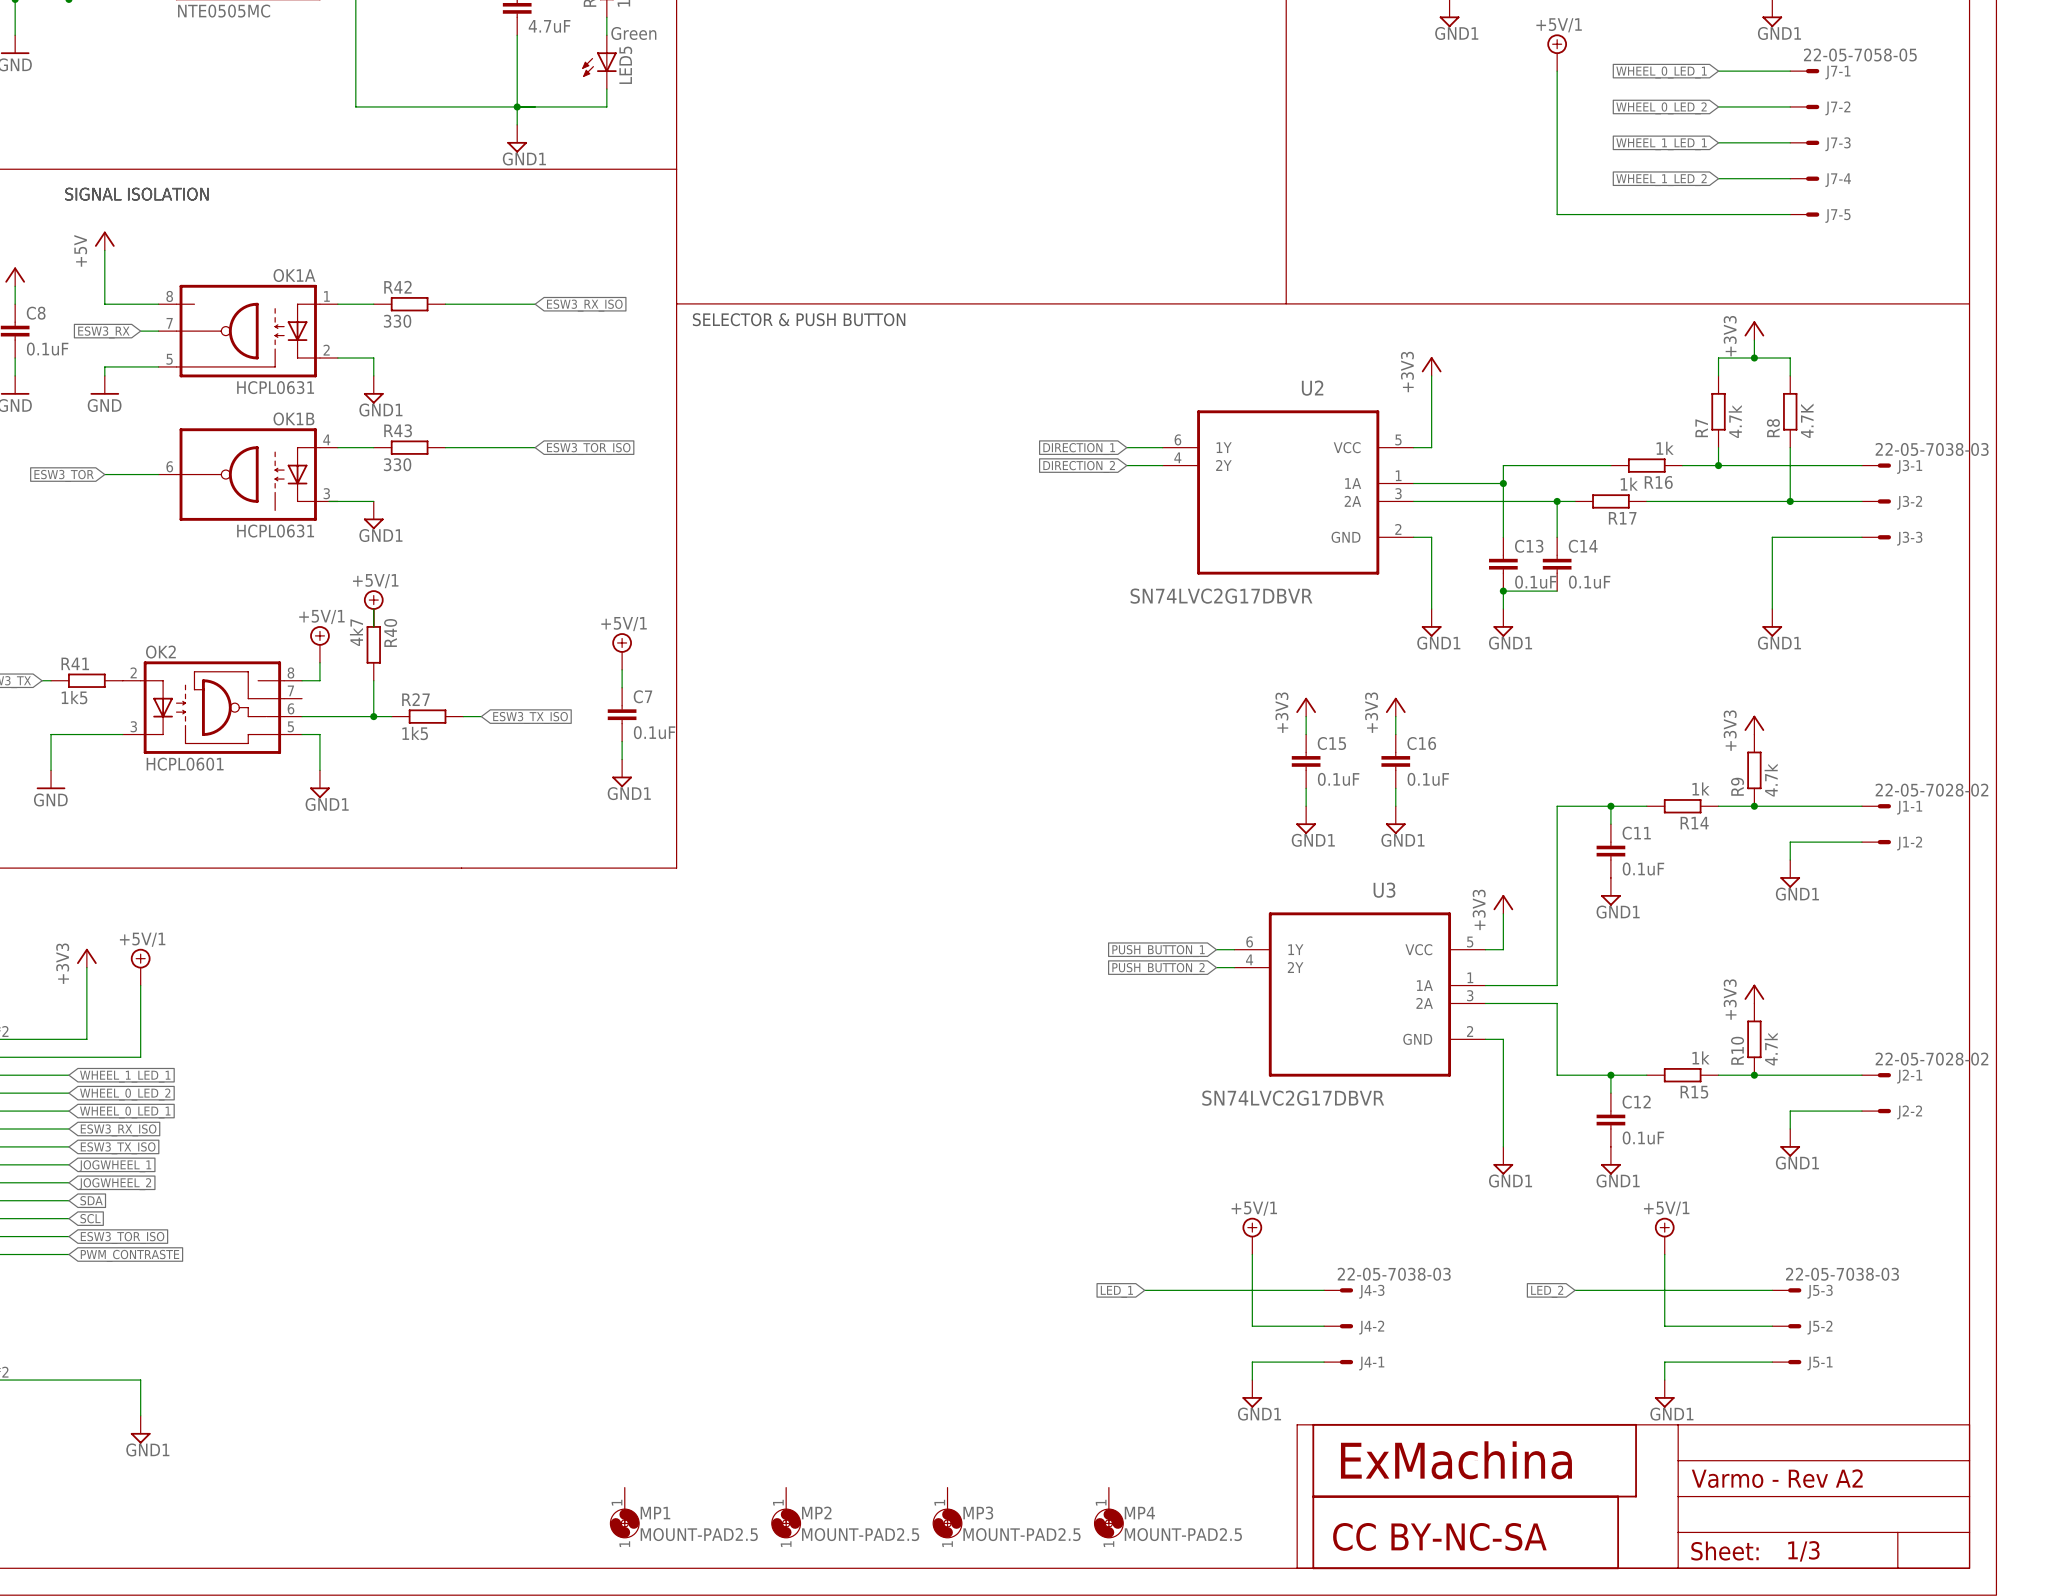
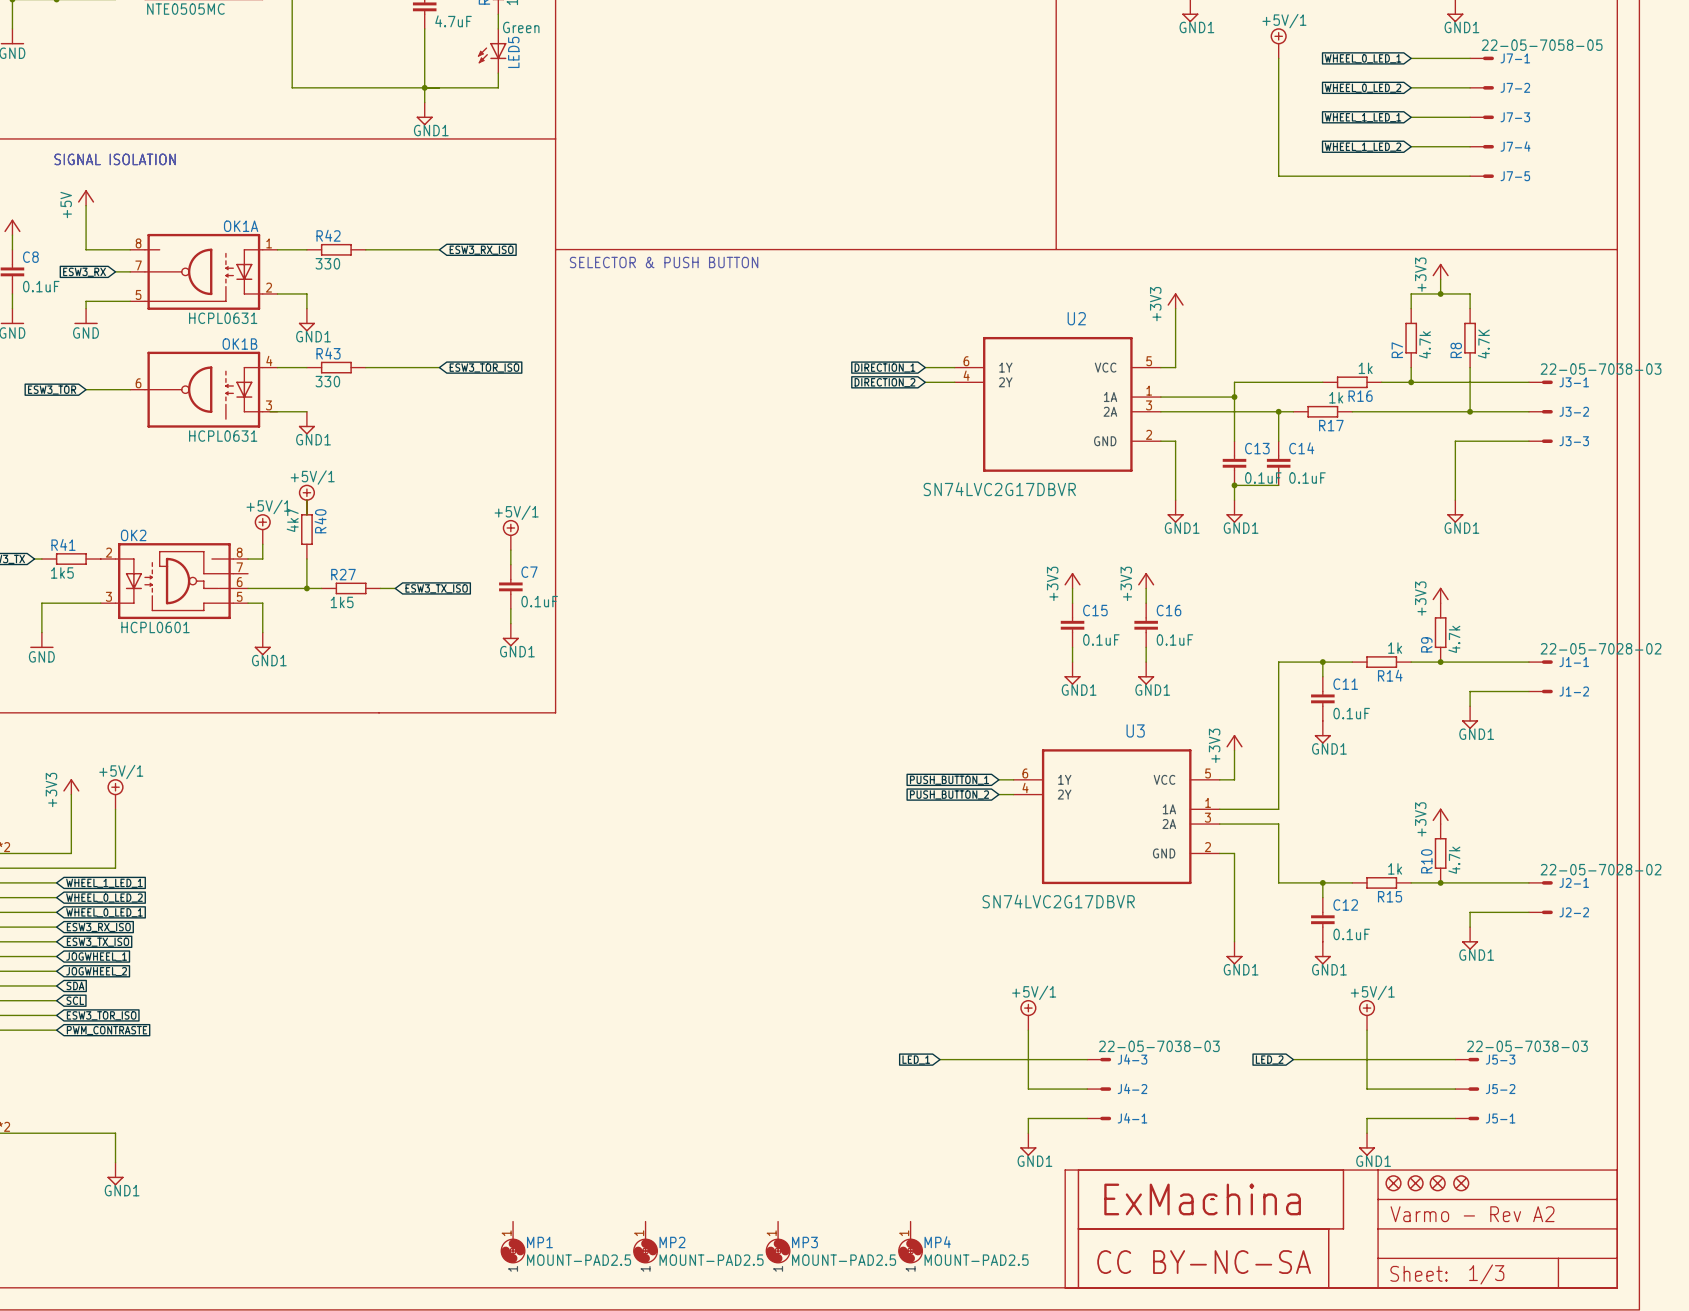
part: none -> (1393, 1183)
part: none -> (1415, 1183)
part: none -> (1437, 1183)
part: none -> (1461, 1183)

